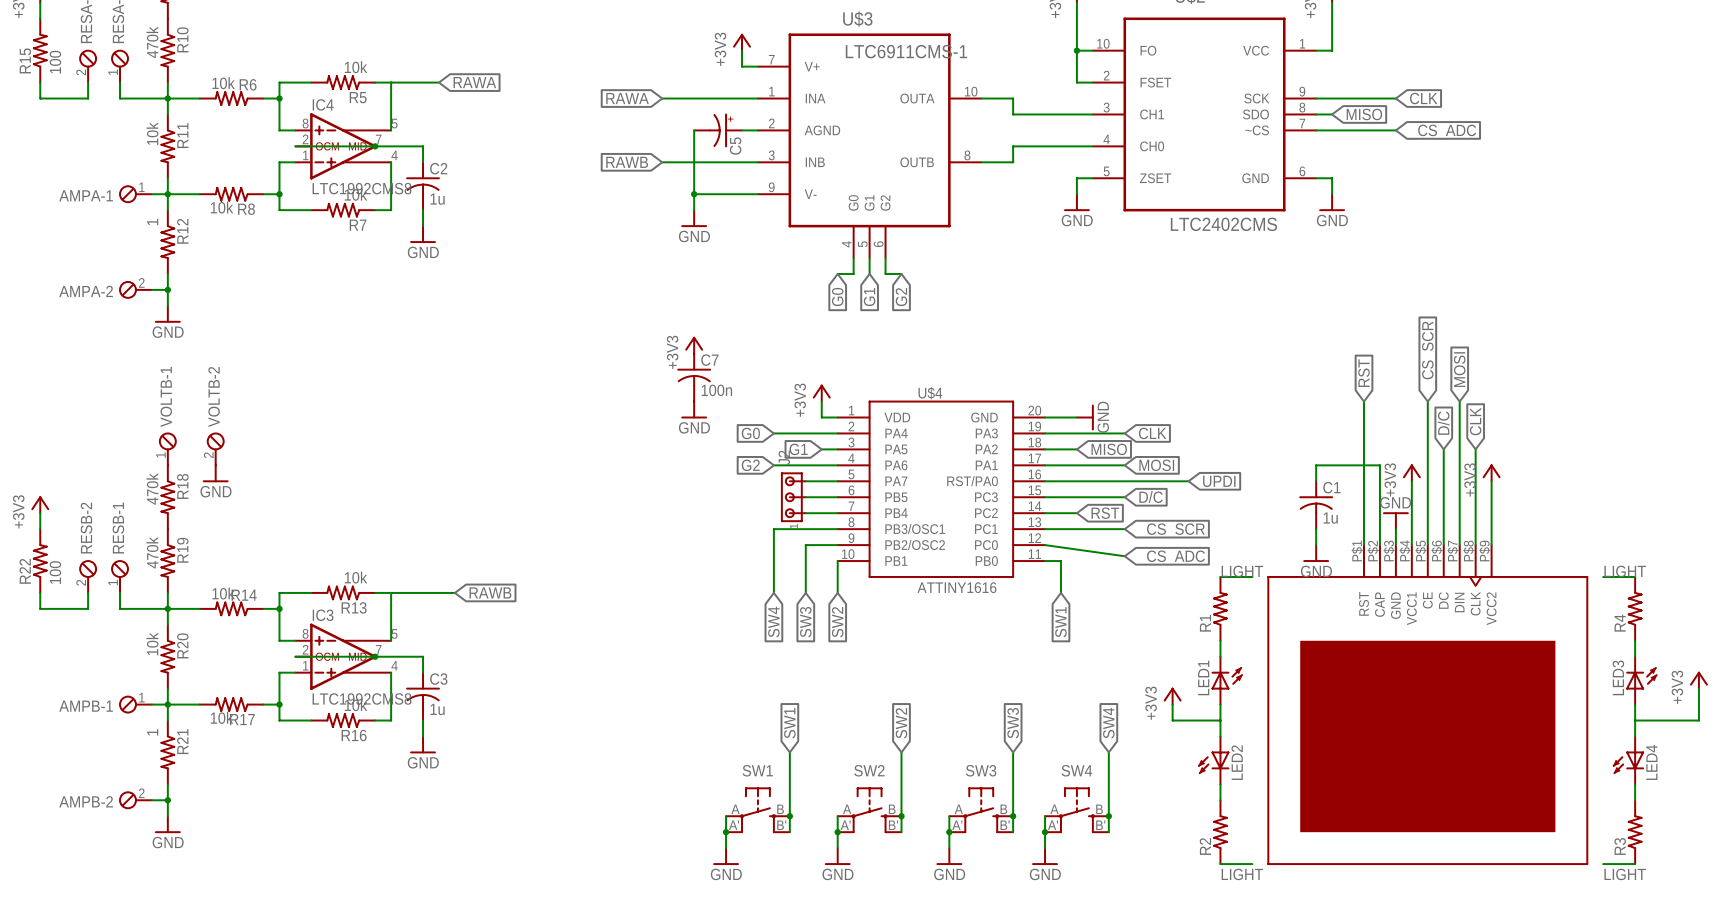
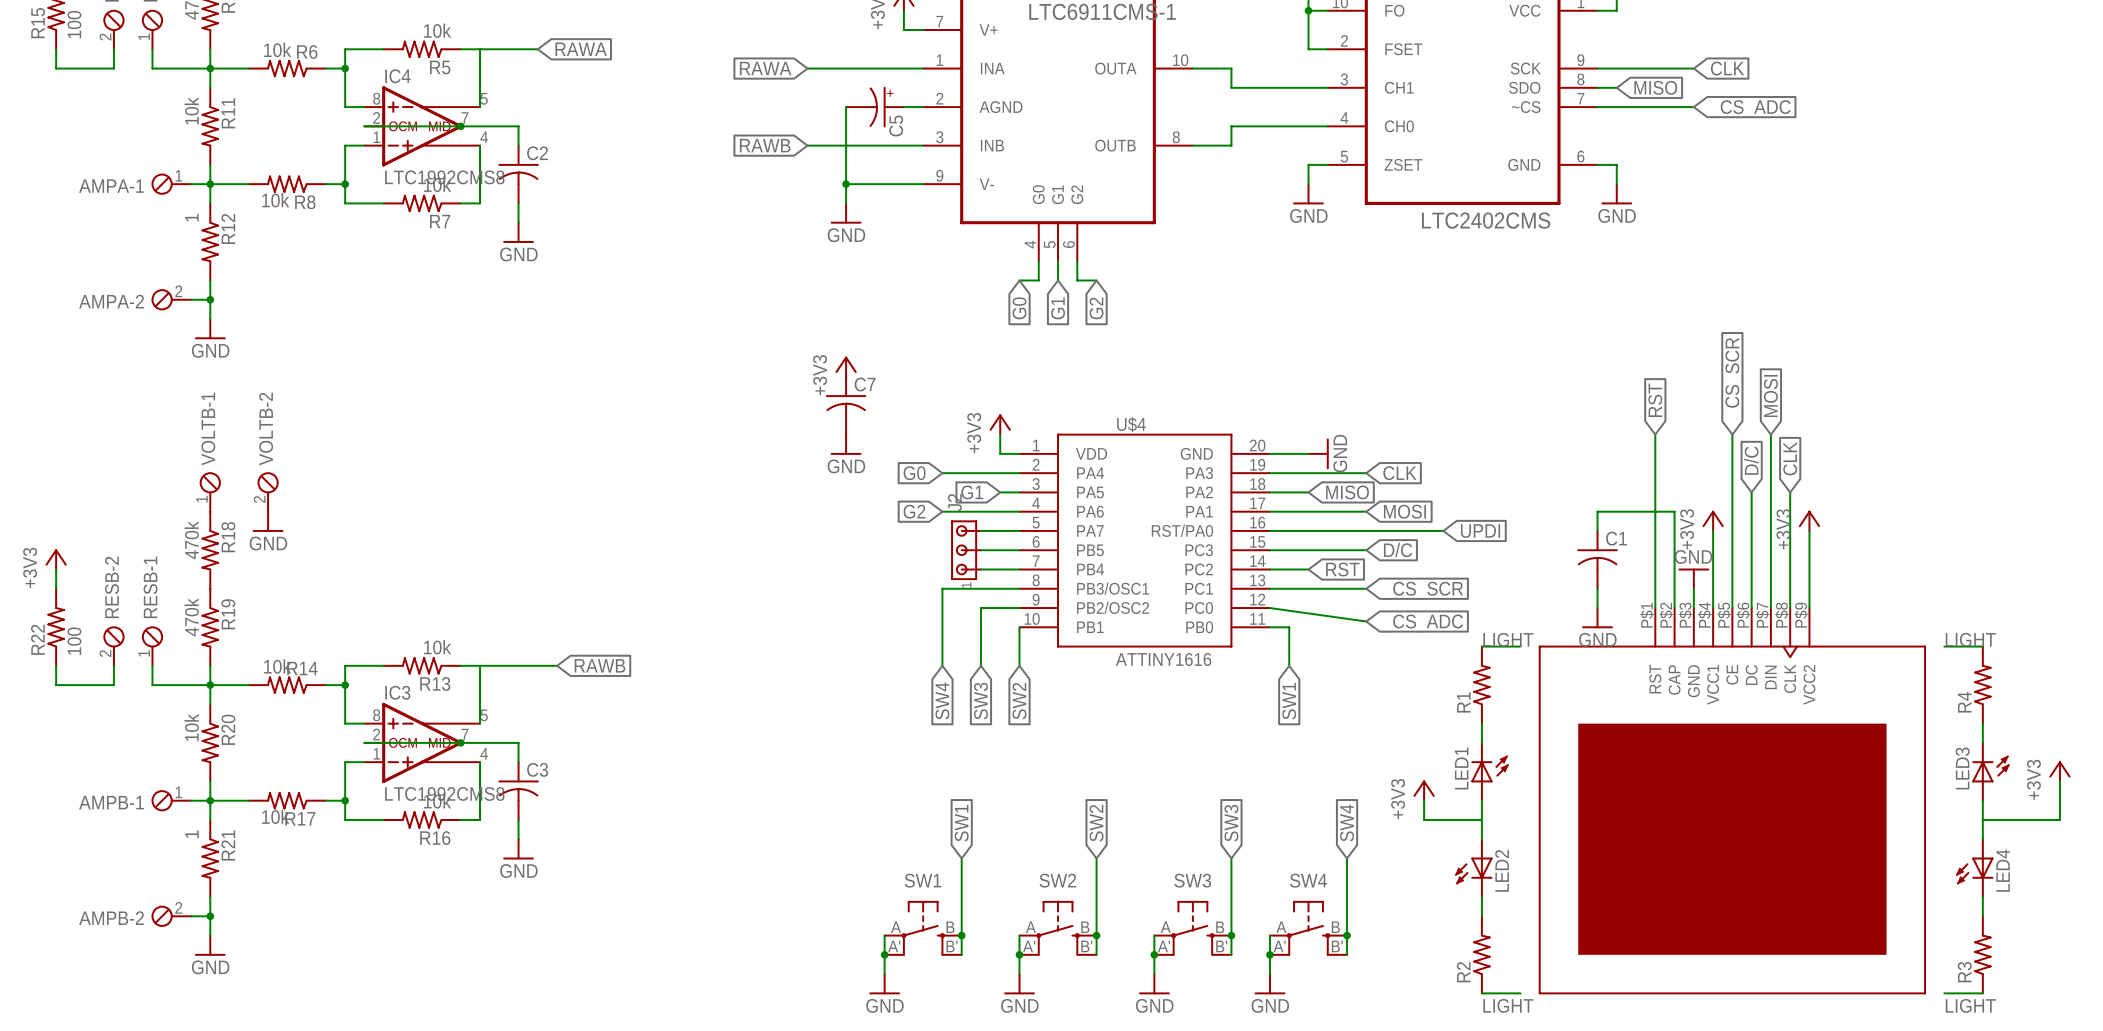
C2 value: 1u (437, 199) -> none
C7 value: 100n (716, 390) -> none
C1 value: 1u (1330, 518) -> none
C3 value: 1u (437, 709) -> none

